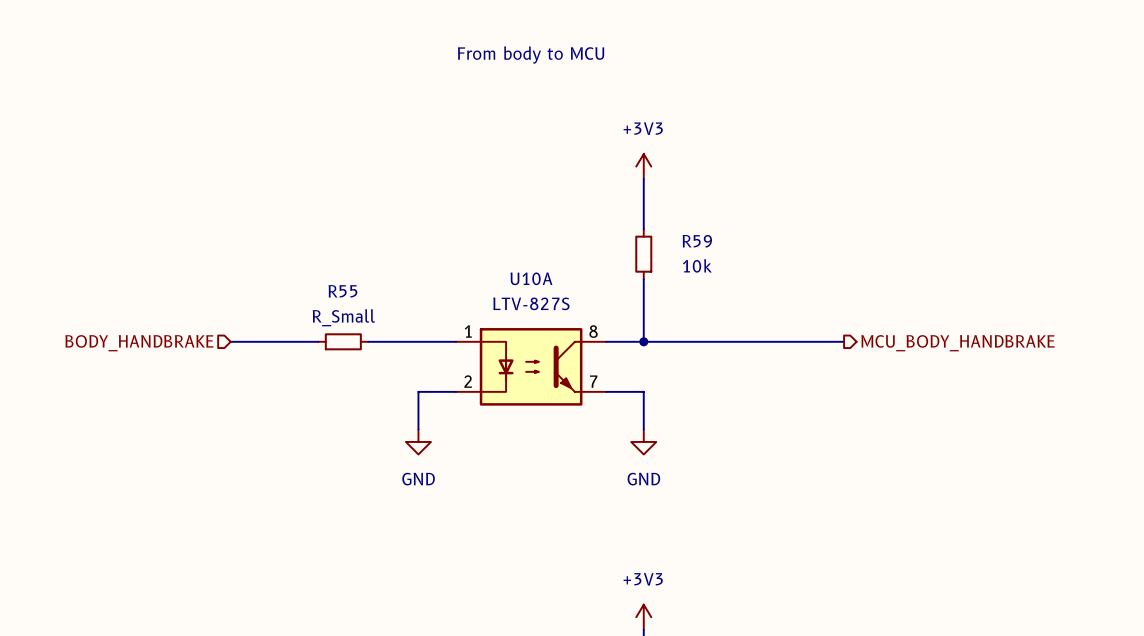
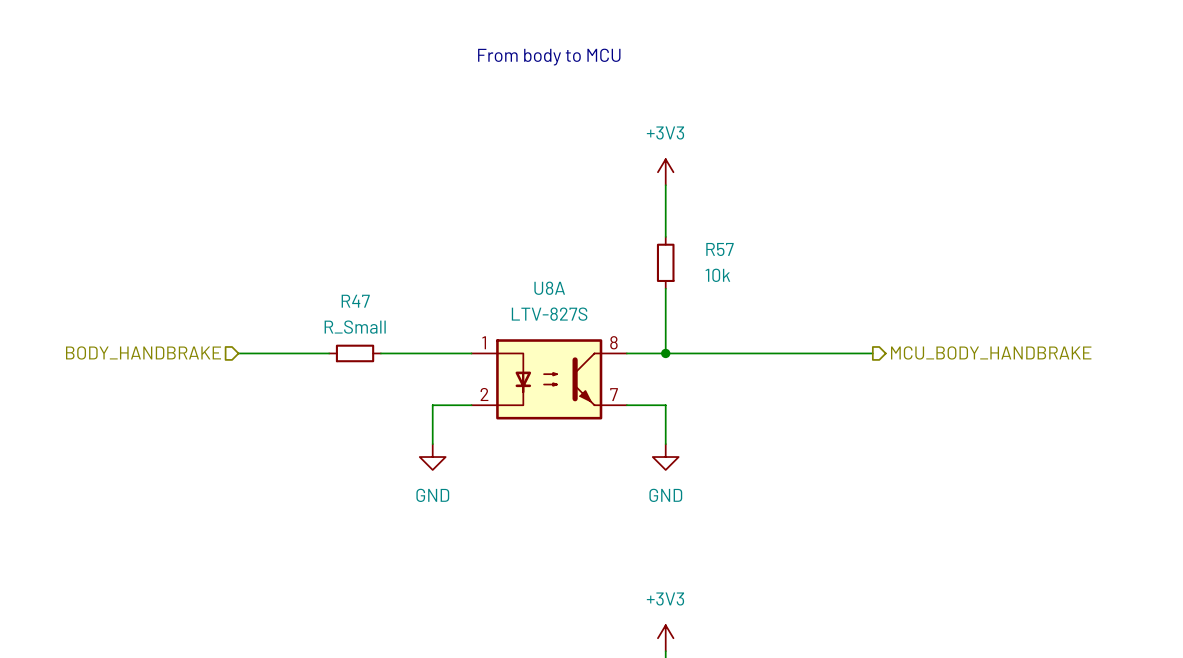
R59 name: R59 (697, 241) -> R57 (720, 249)
U10A name: U10A (531, 278) -> U8A (549, 288)
R55 name: R55 (342, 291) -> R47 (355, 301)

